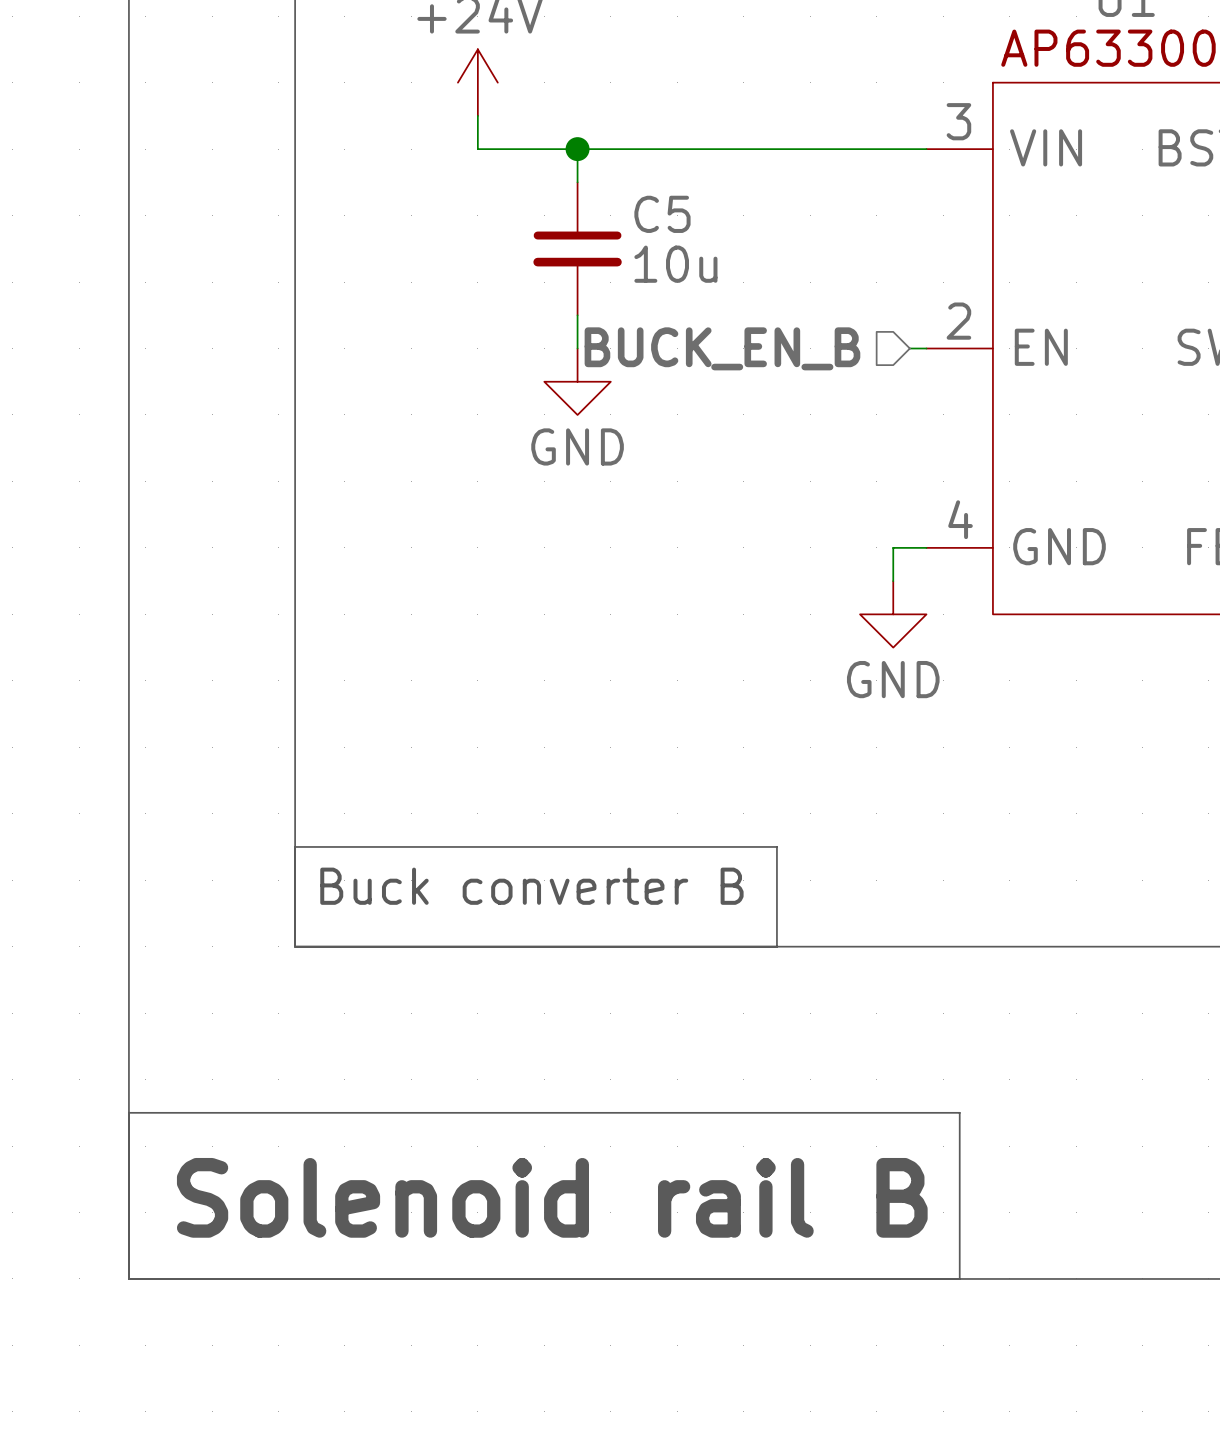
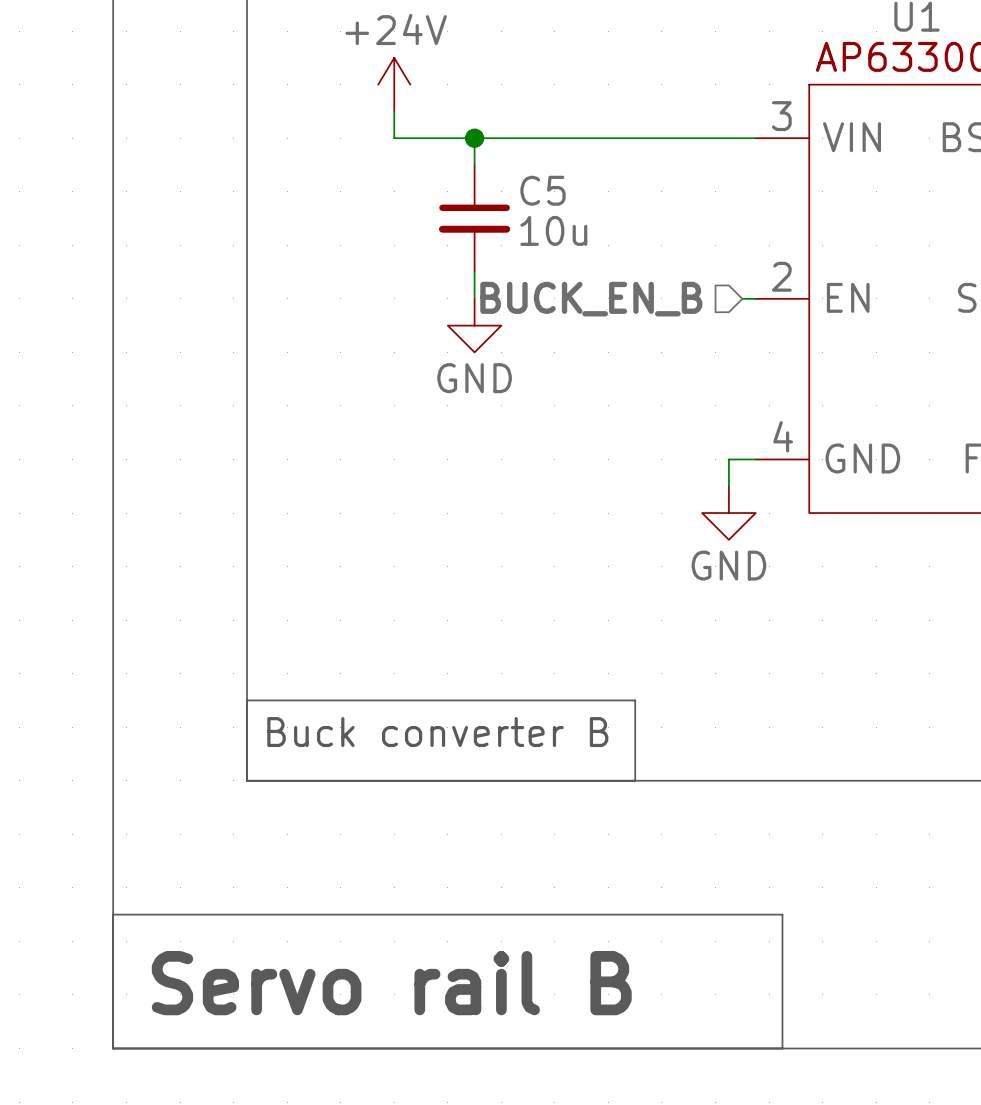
text: Solenoid rail B (552, 1197) -> Servo rail B (391, 983)

